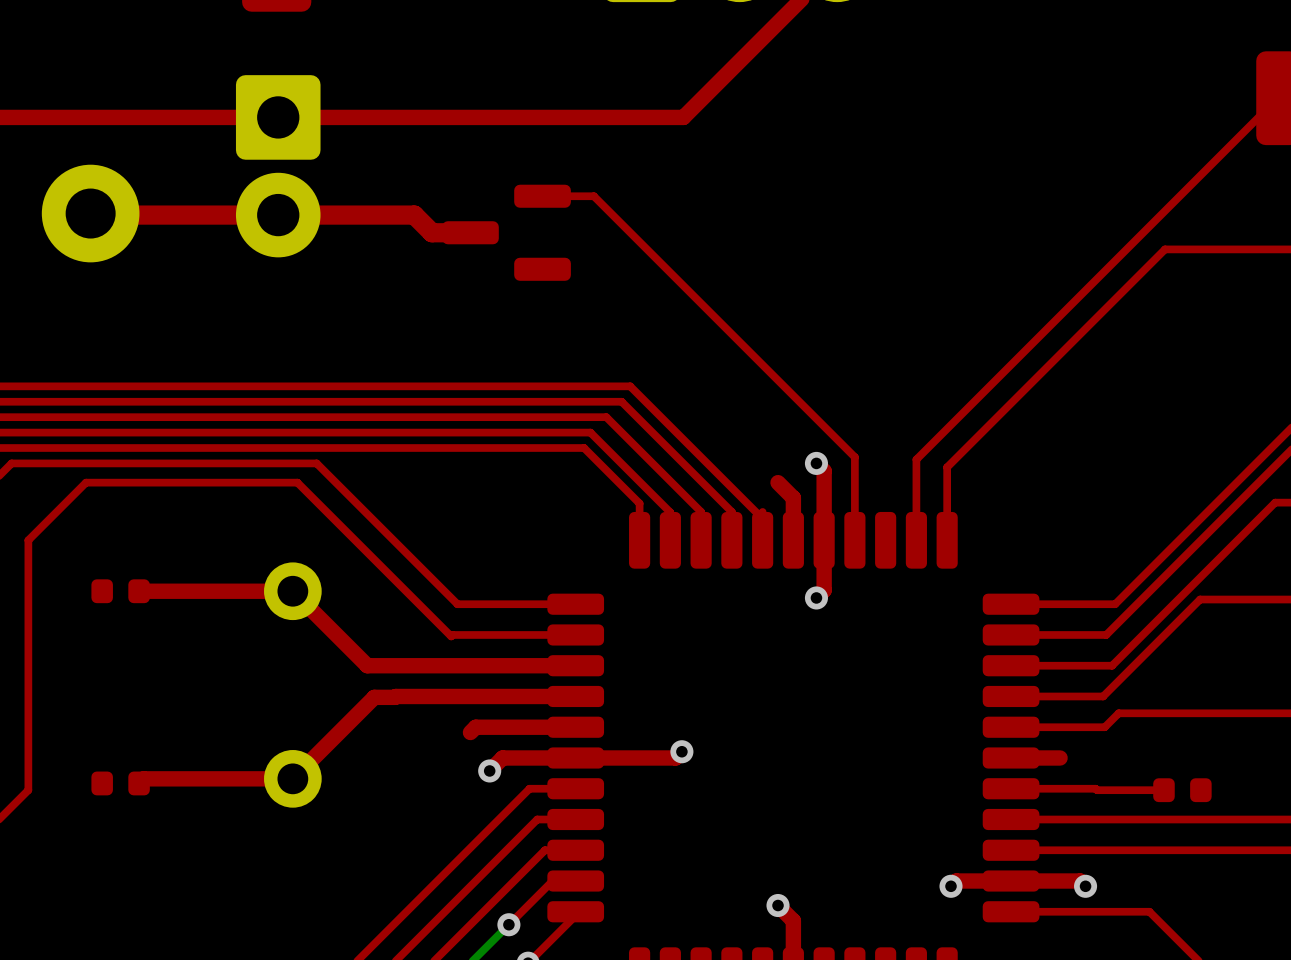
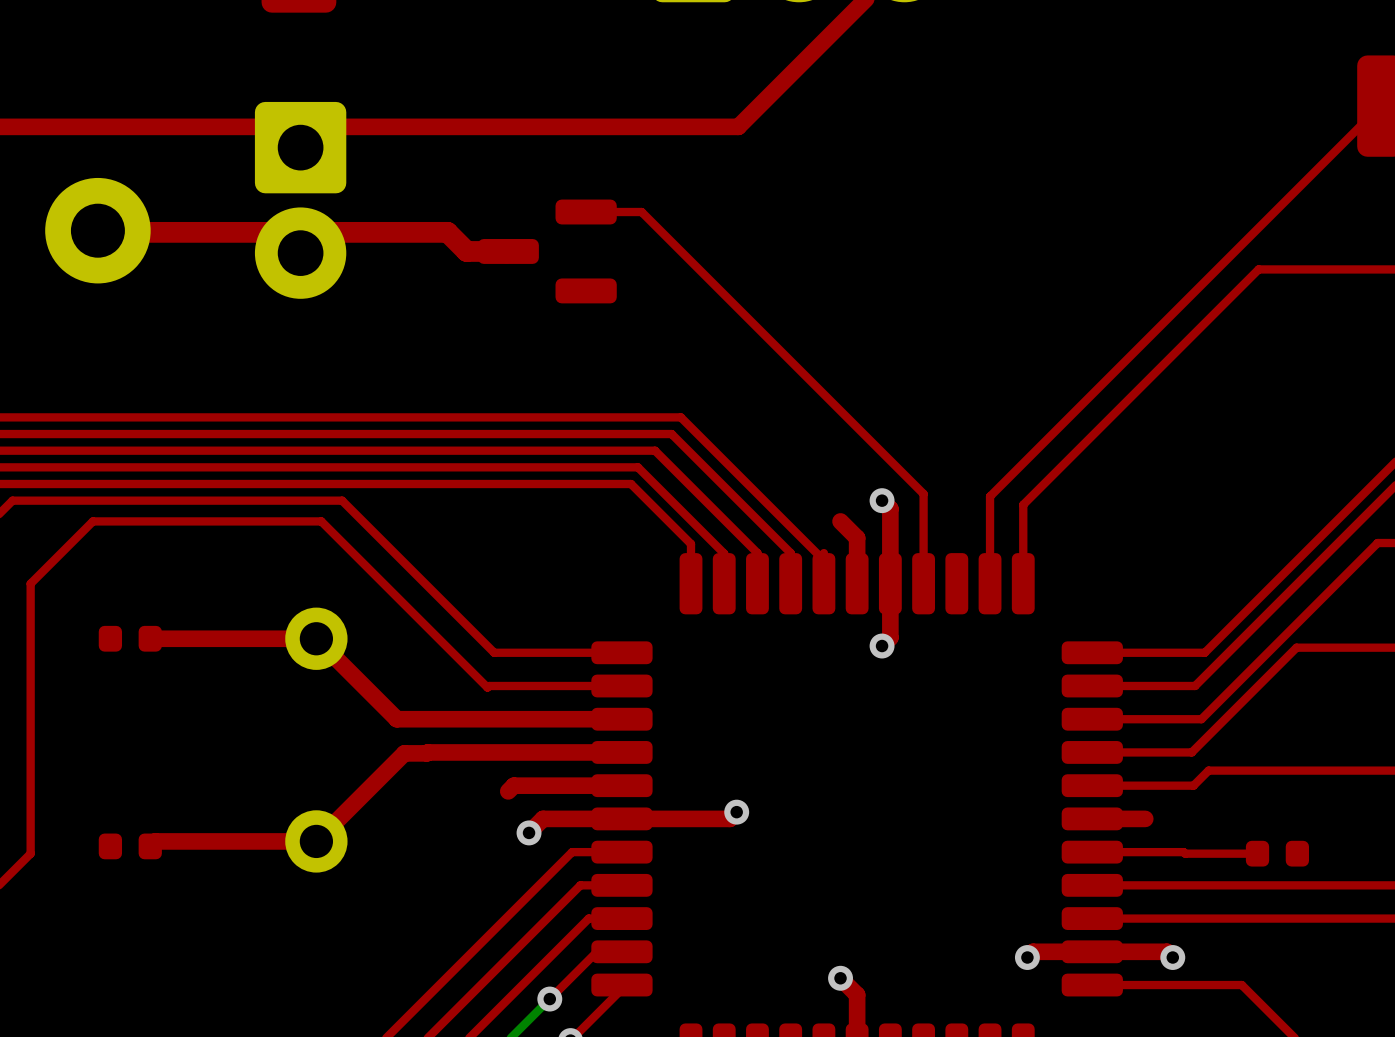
part position: (278, 166) -> (300, 200)

